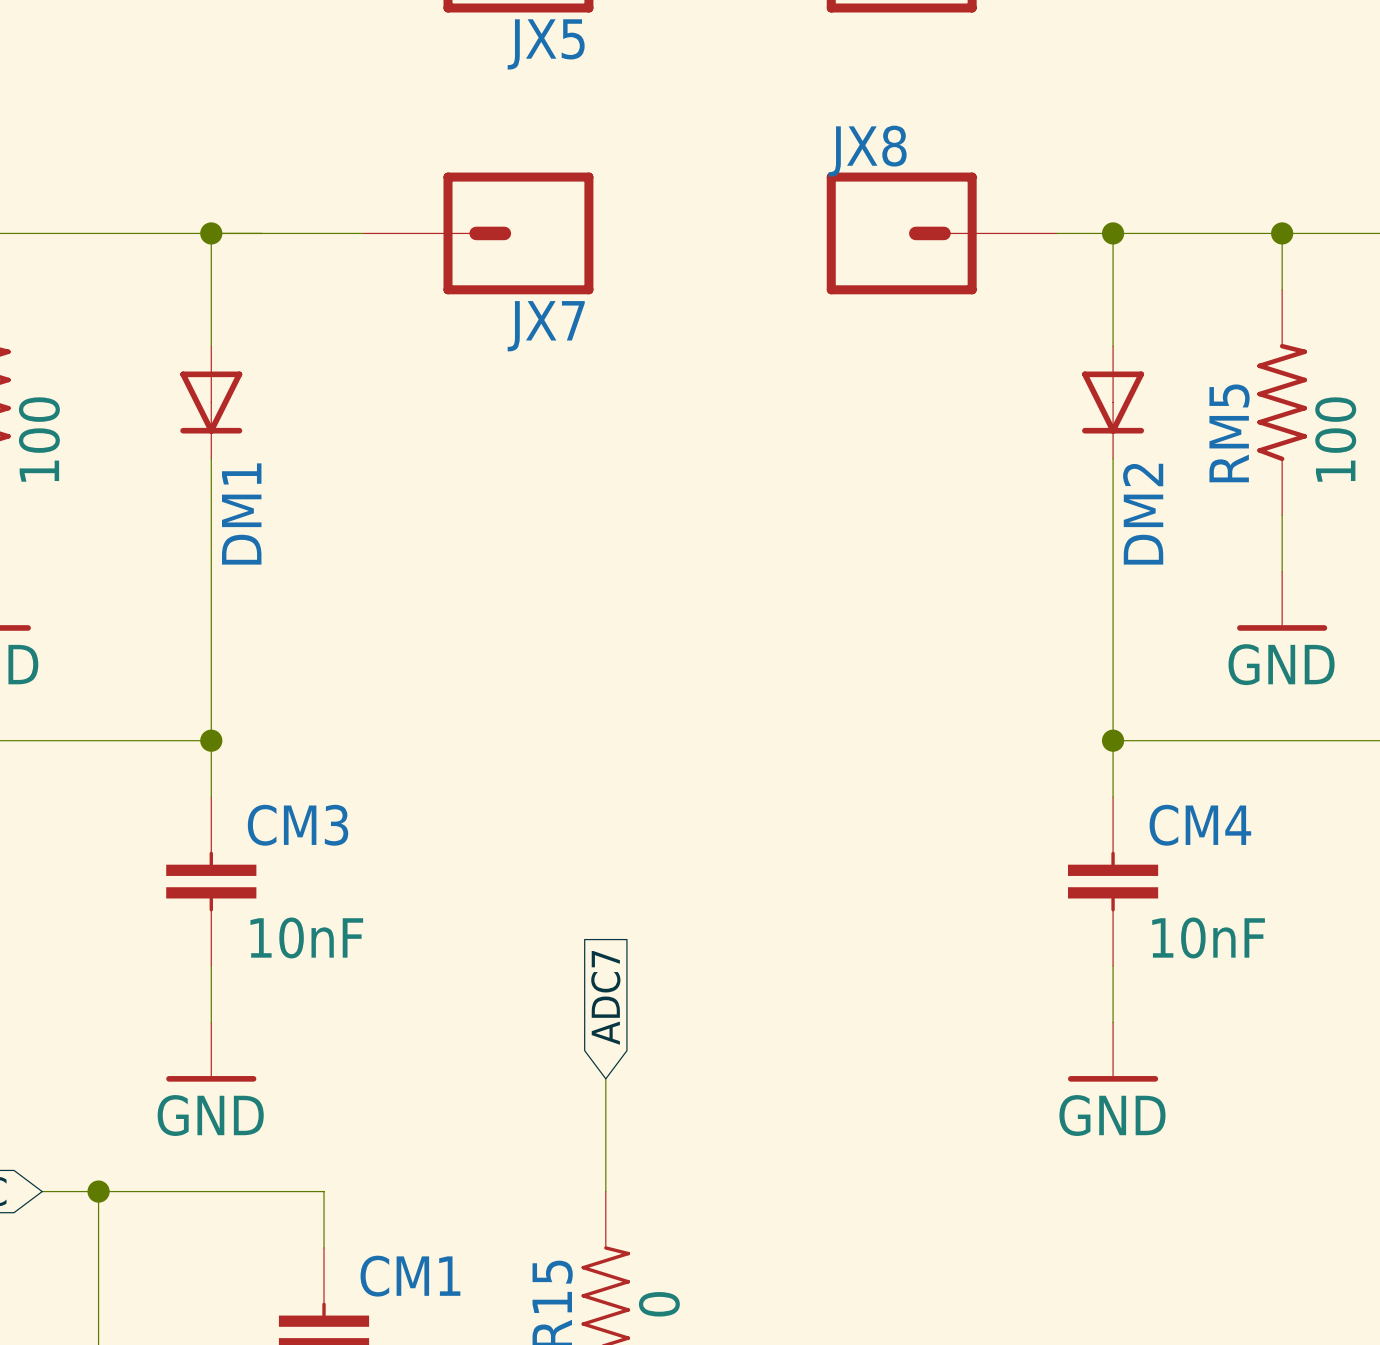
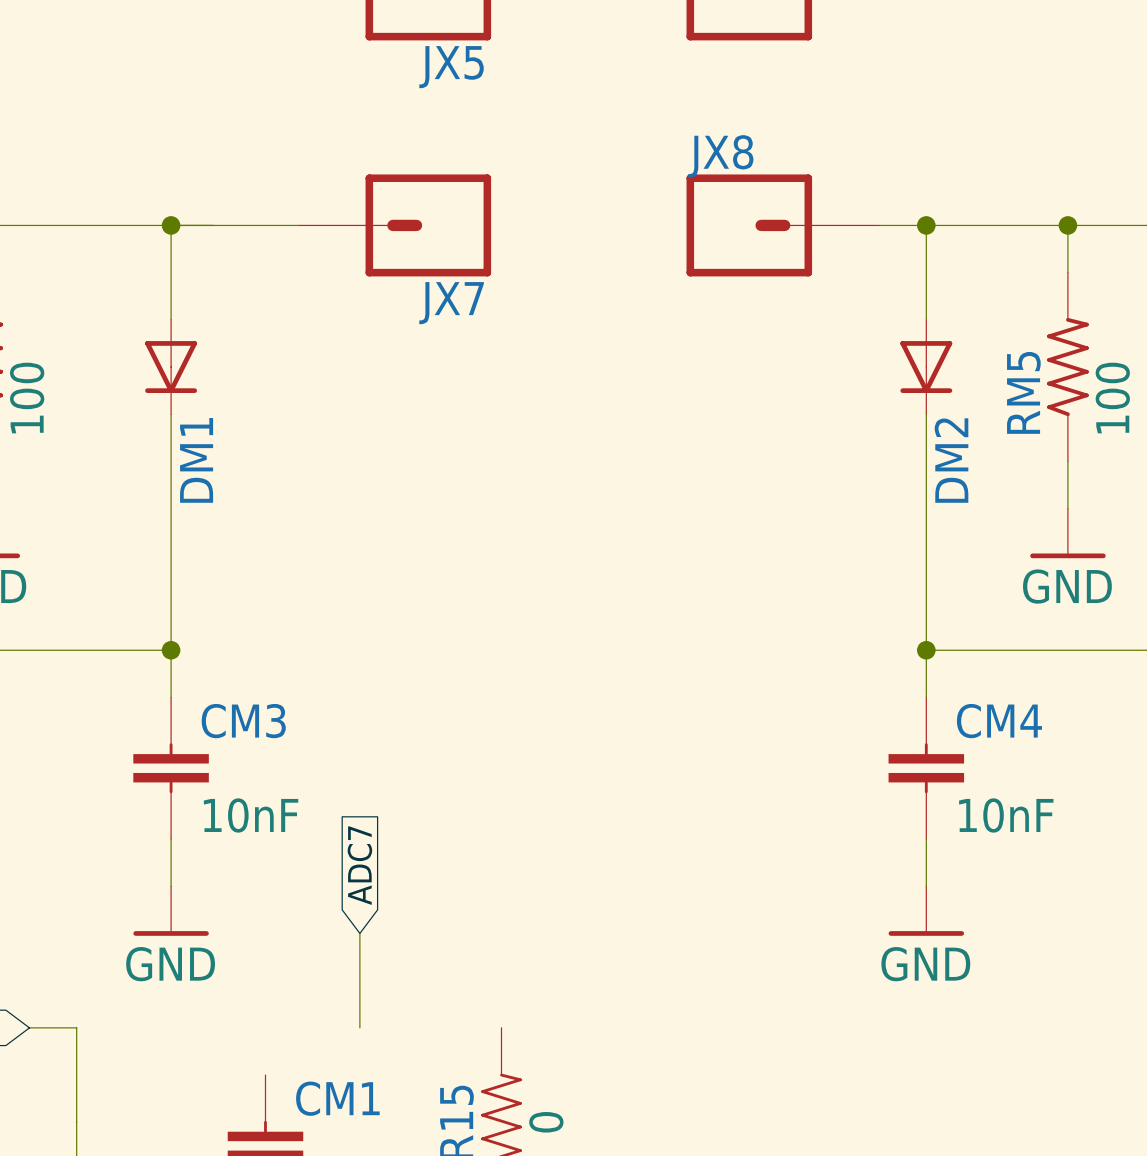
global label position: ADC7 (605, 997) -> ADC7 (359, 865)
wire: (605, 1078) (605, 1191) -> (359, 933) (359, 1027)
wire: (98, 1191) (324, 1191) (324, 1247) -> none
junction: (98, 1191) -> none

